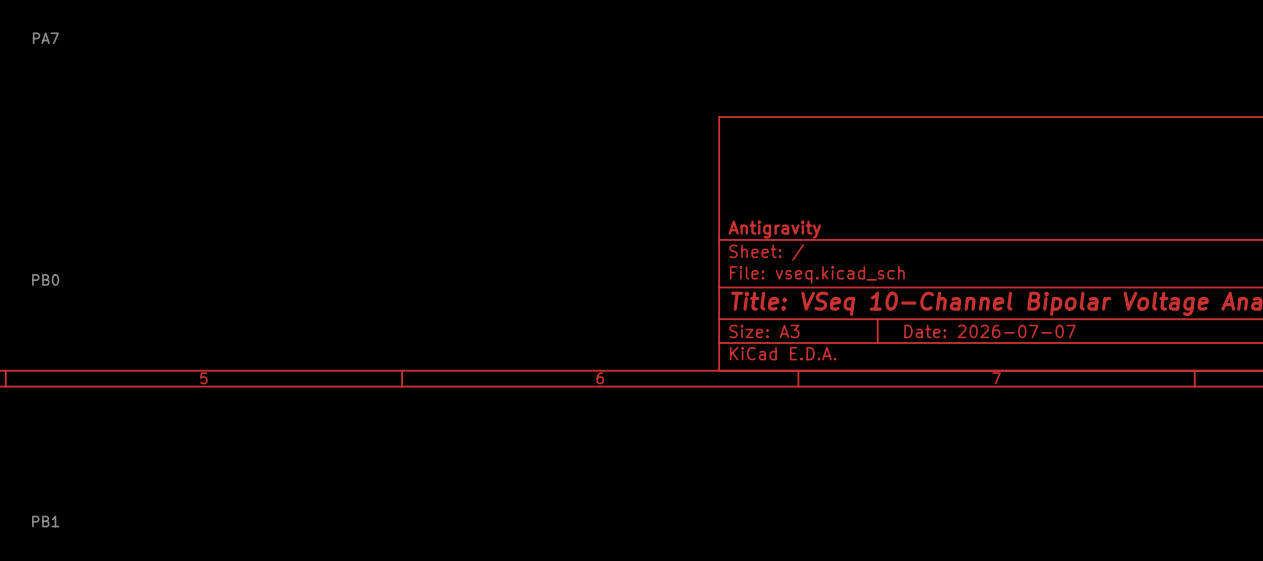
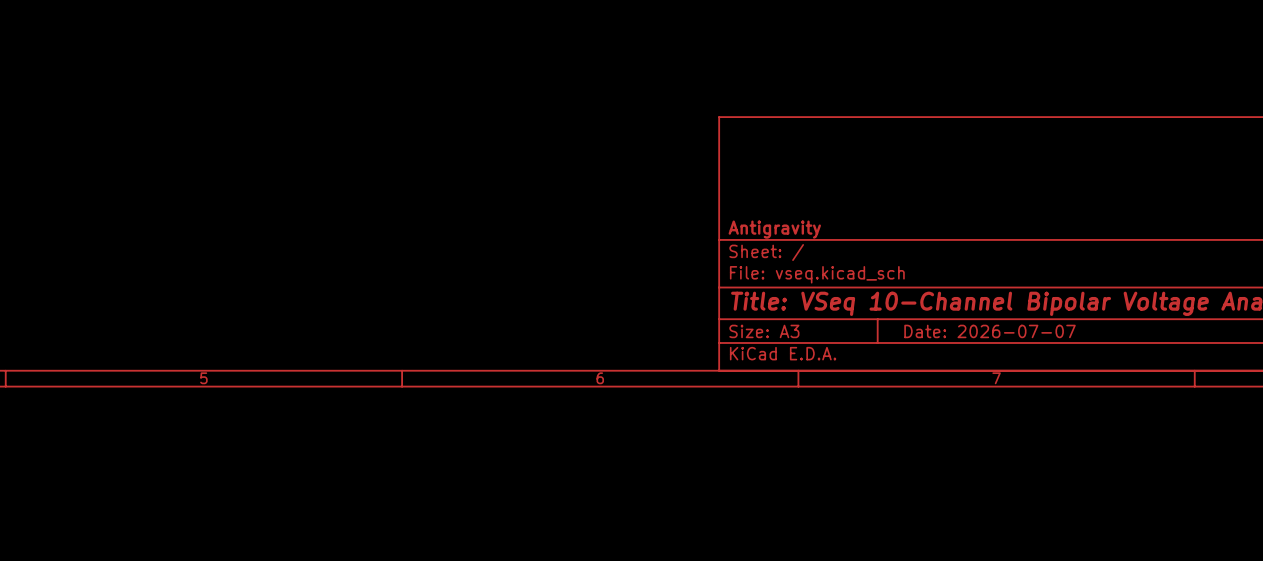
text: PA7 (45, 38) -> none
text: PB0 (45, 279) -> none
text: PB1 (45, 521) -> none

